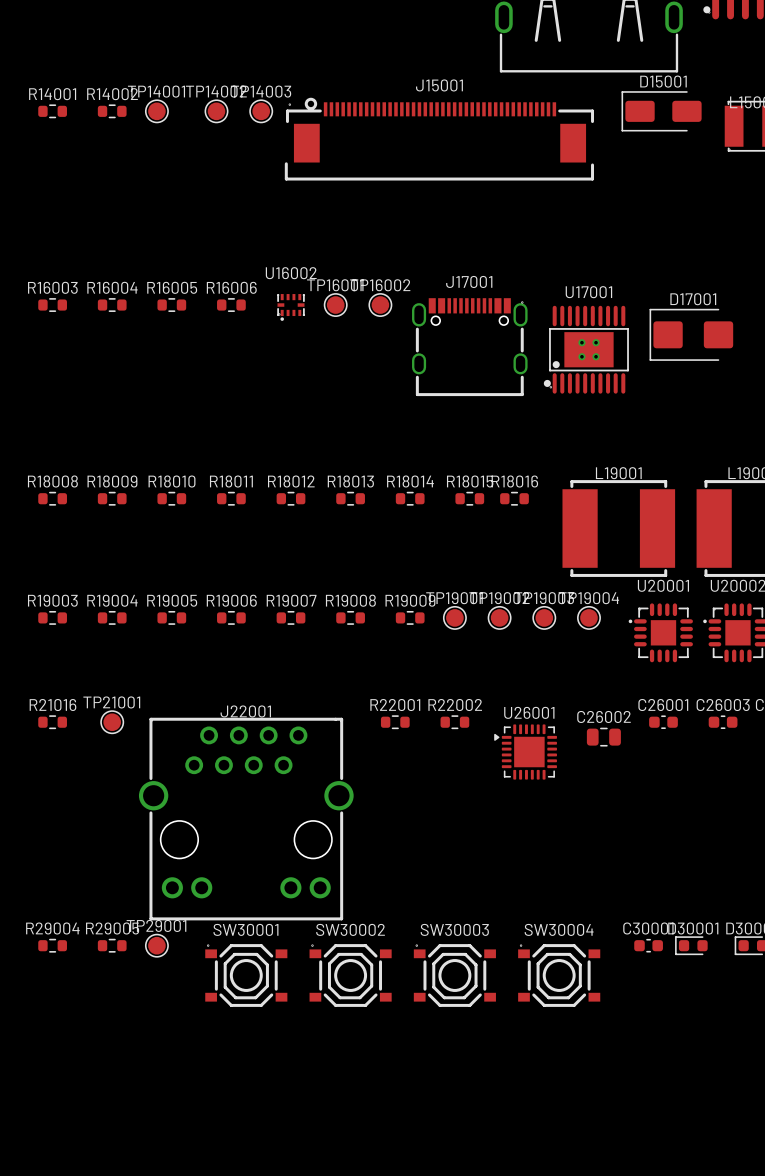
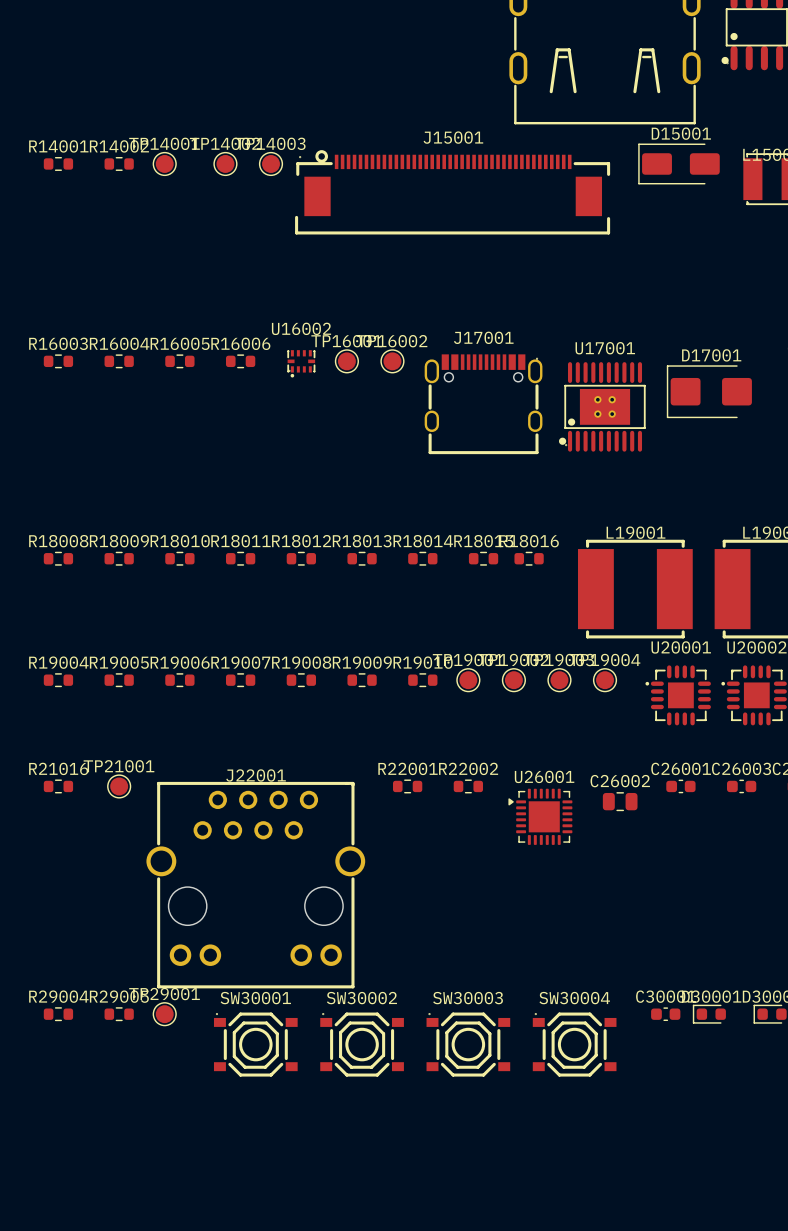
R19003 name: R19003 (52, 600) -> R19004 (58, 662)
R19004 name: R19004 (112, 600) -> R19005 (119, 662)
R19005 name: R19005 (172, 600) -> R19006 (180, 662)
R19006 name: R19006 (231, 600) -> R19007 (240, 662)
R19007 name: R19007 (291, 600) -> R19008 (301, 662)
R19008 name: R19008 (350, 600) -> R19009 (362, 662)
R19009 name: R19009 (410, 600) -> R19010 (423, 662)

